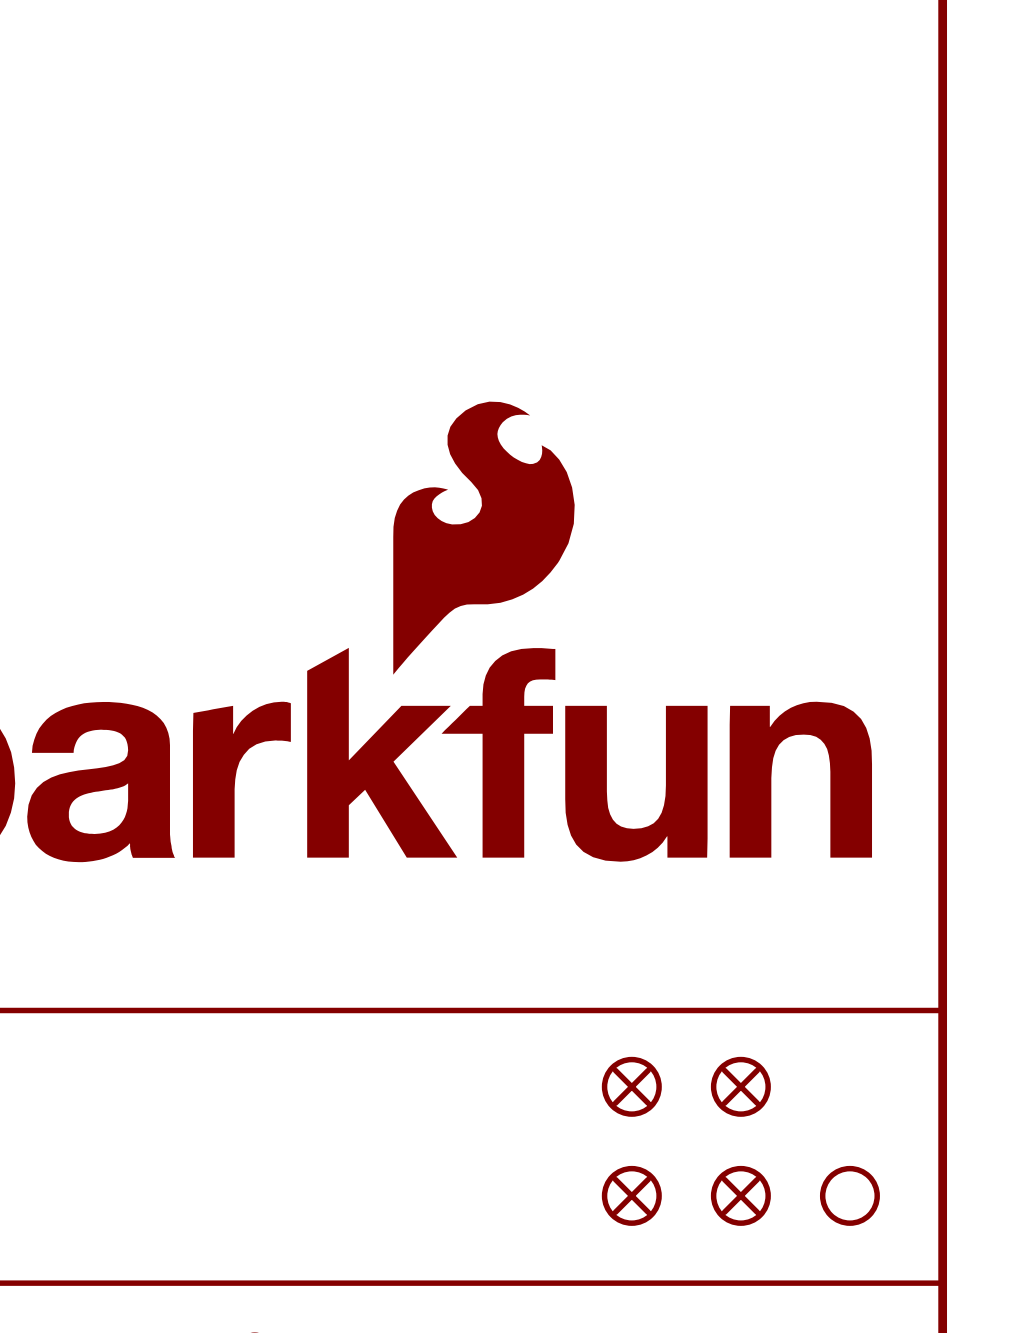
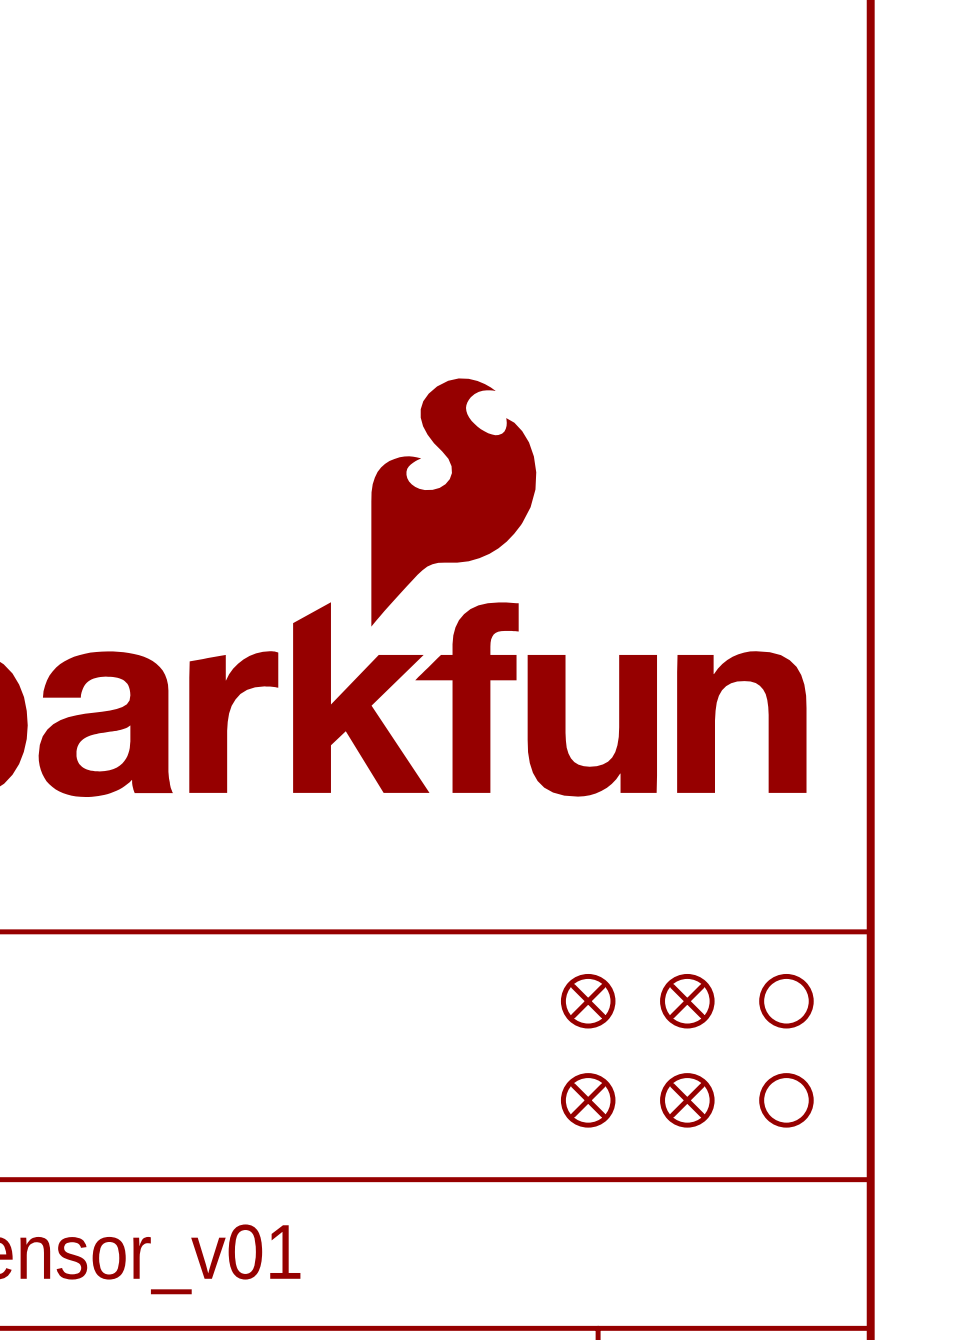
part: none -> (786, 1001)

